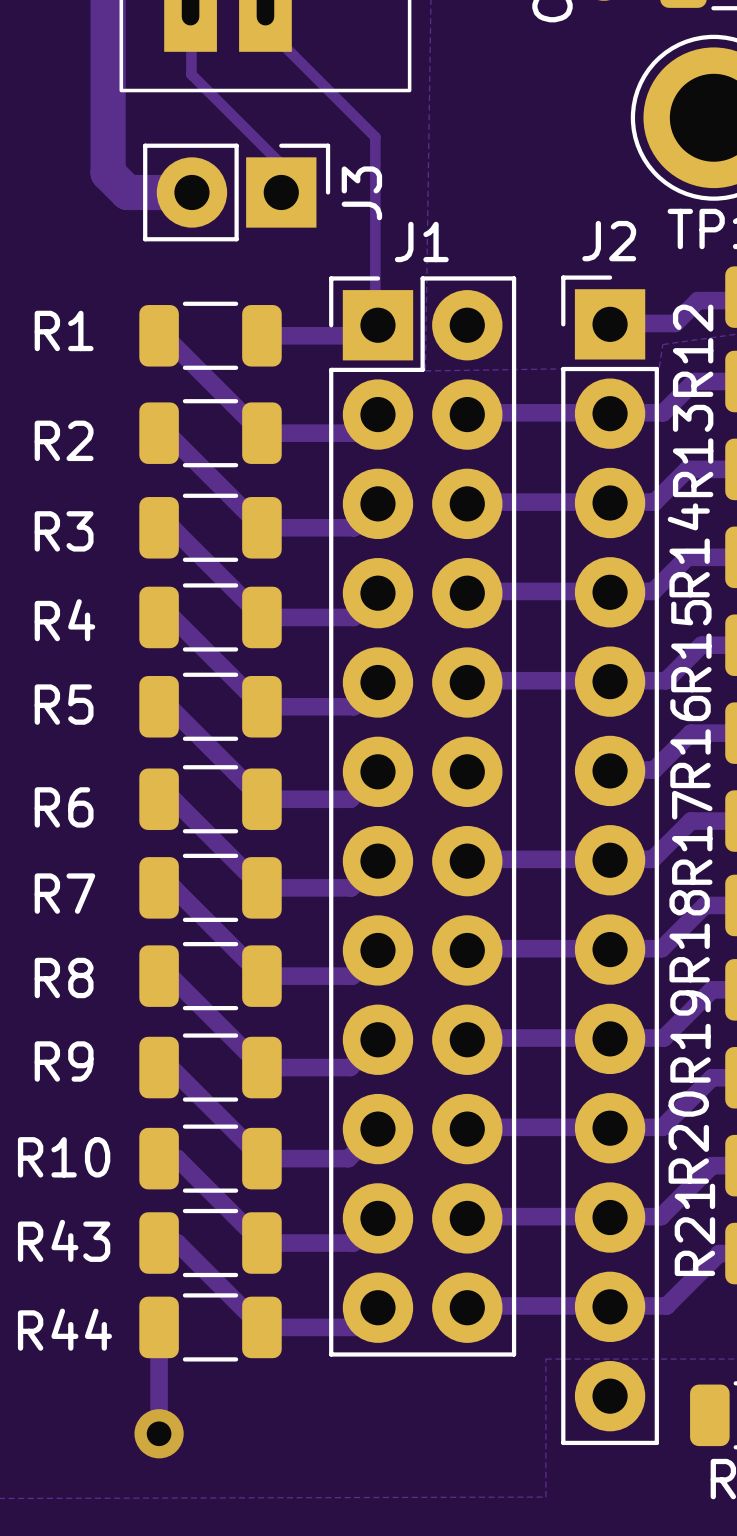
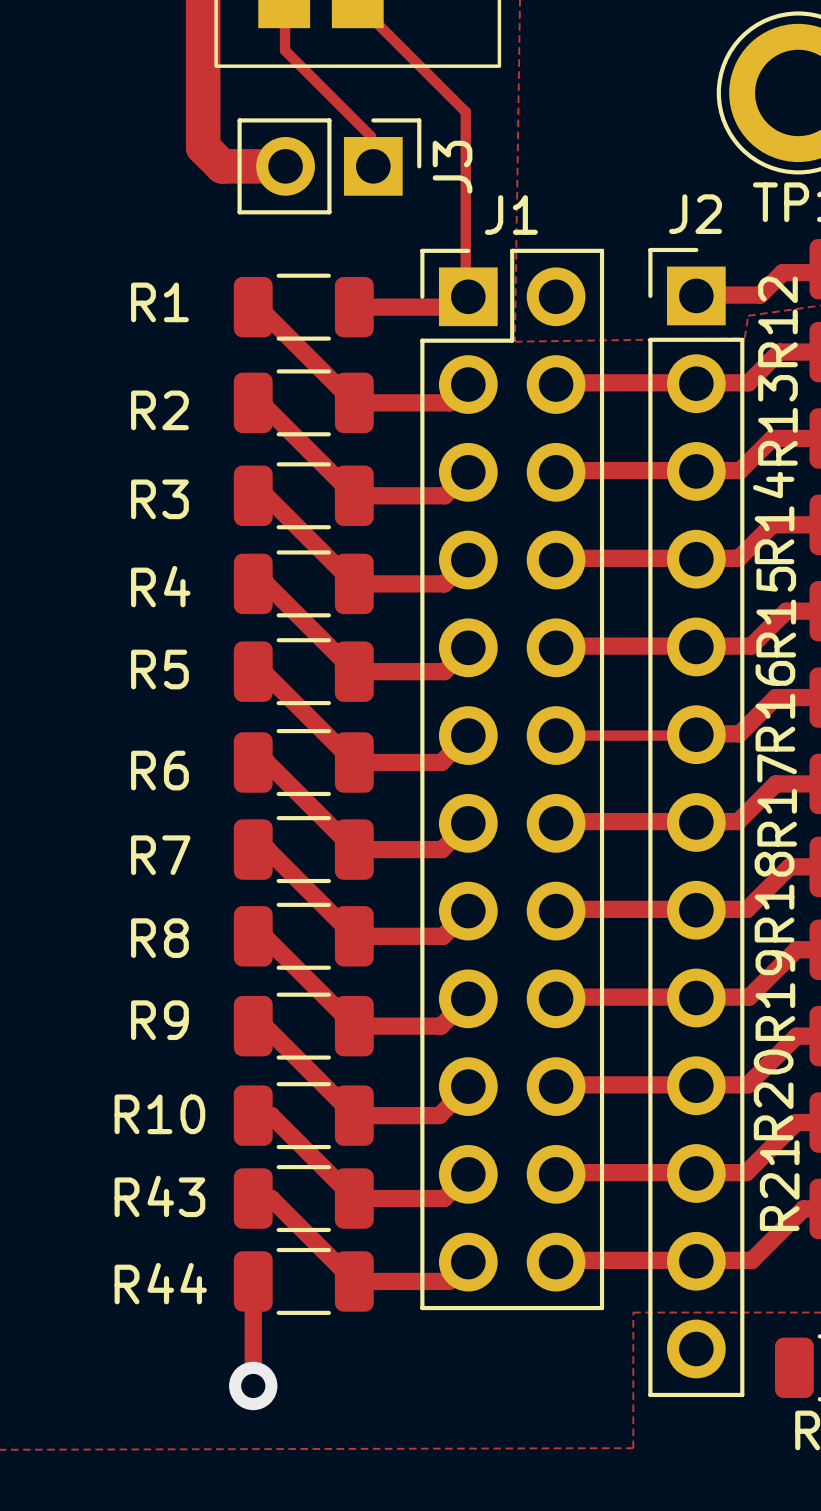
J3 footprint: [143, 143, 331, 242] -> [237, 118, 422, 215]
J2 footprint: [561, 275, 659, 1446] -> [648, 247, 745, 1398]
J1 footprint: [329, 276, 517, 1357] -> [420, 248, 605, 1311]
track: none -> (696, 734) (556, 735)

